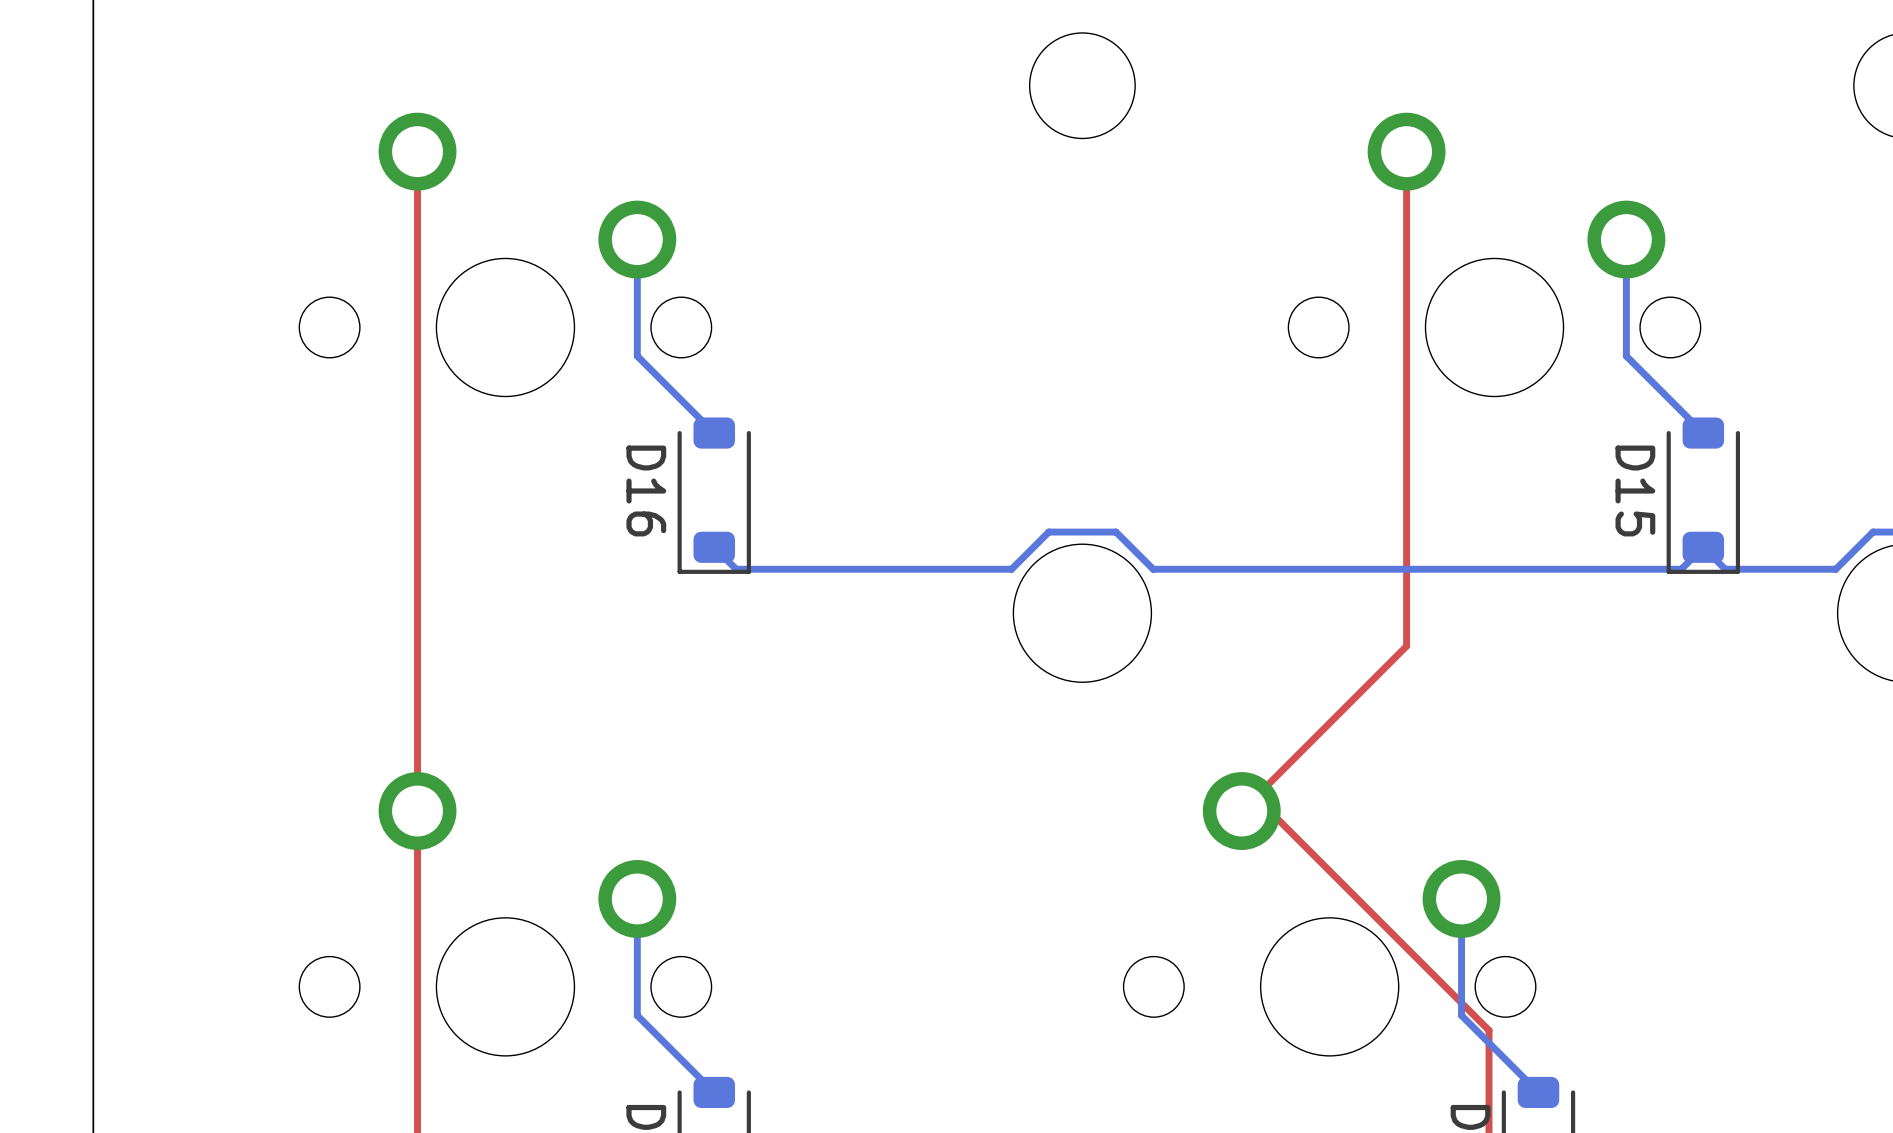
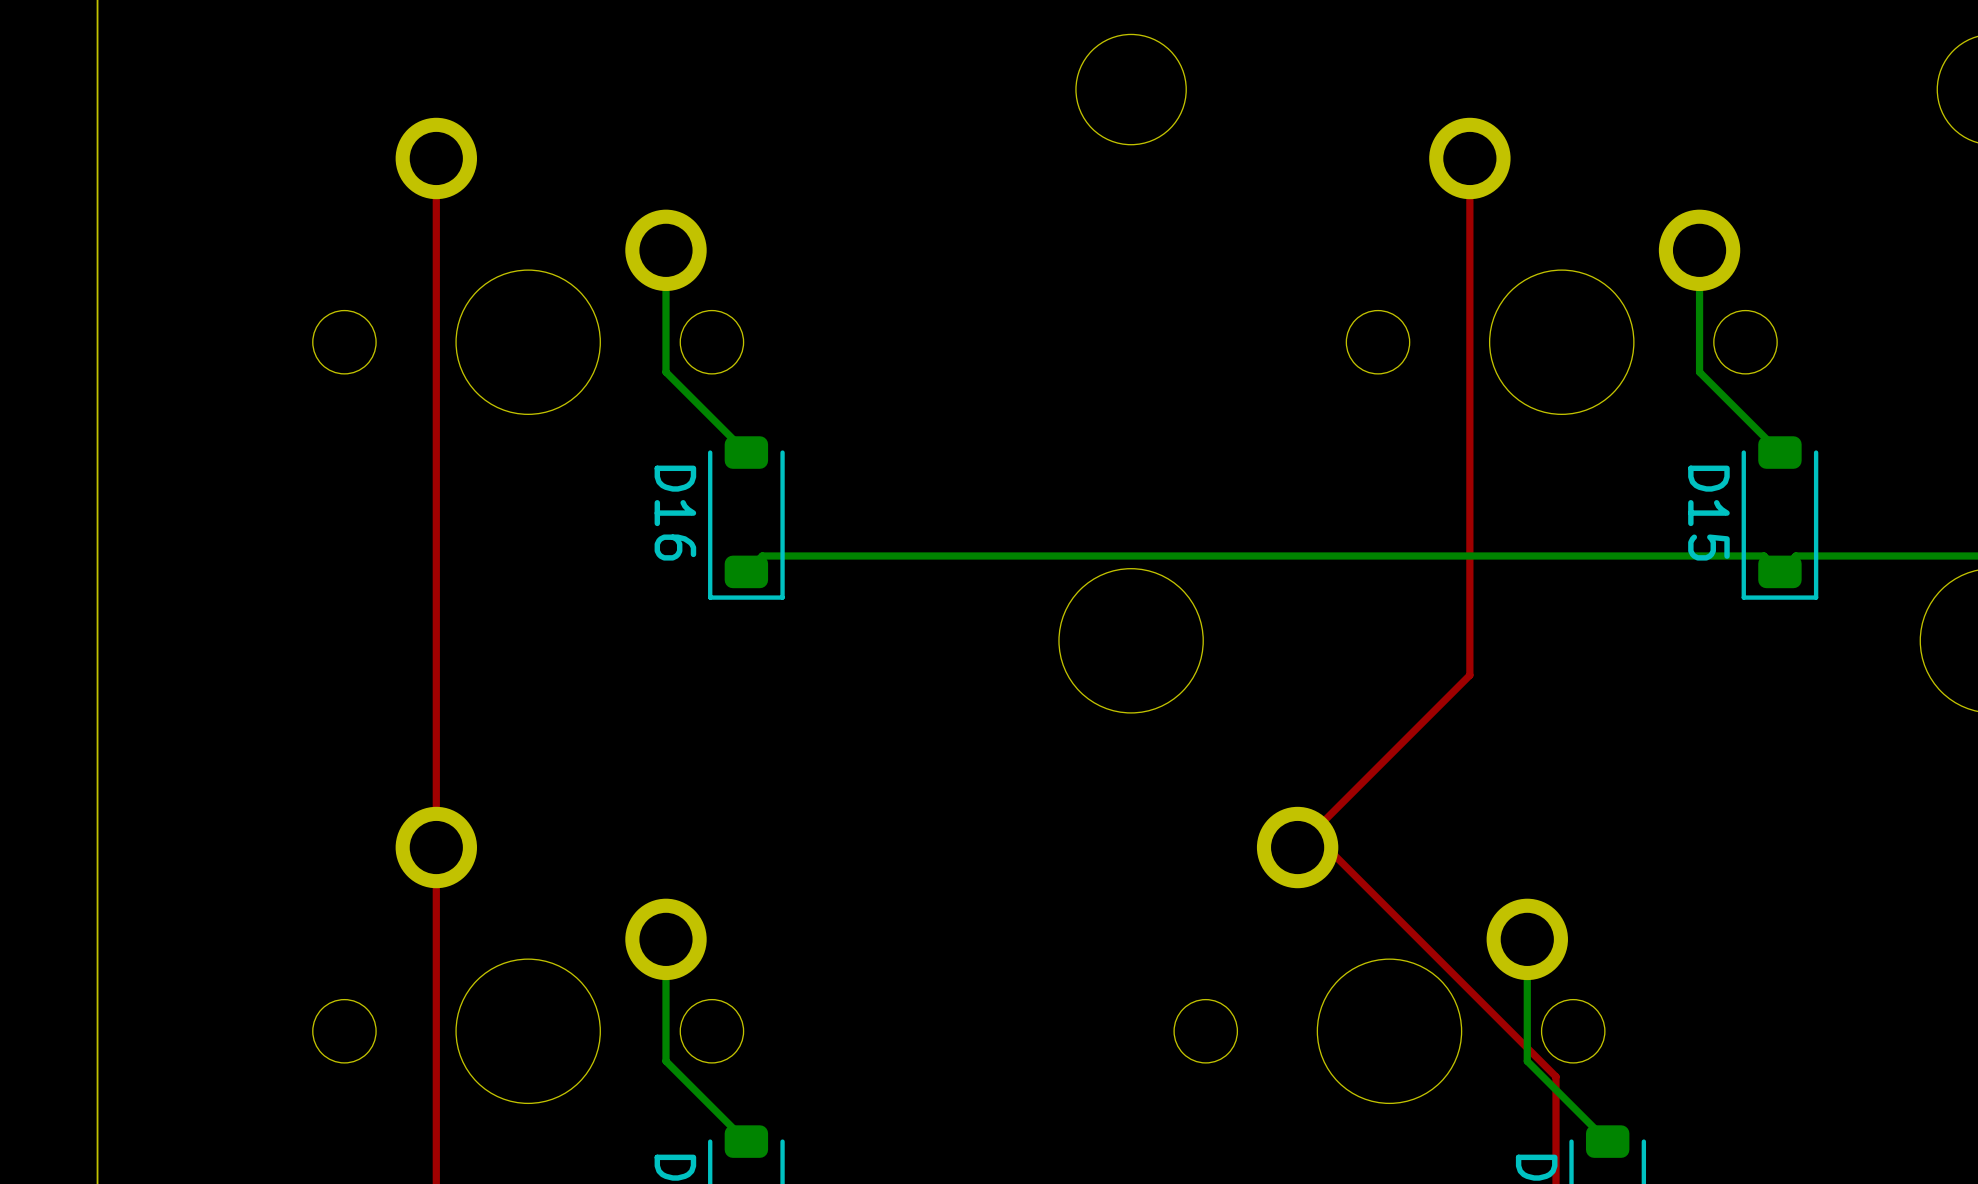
bottom track: (1048, 532) (1011, 569) (736, 569) (714, 547) -> (1095, 555) (762, 555) (746, 571)
bottom track: (1873, 532) (1835, 569) (1725, 569) (1703, 547) (1681, 569) (1153, 569) (1116, 532) -> (1957, 555) (1795, 555) (1779, 571) (1764, 555) (1166, 555)

